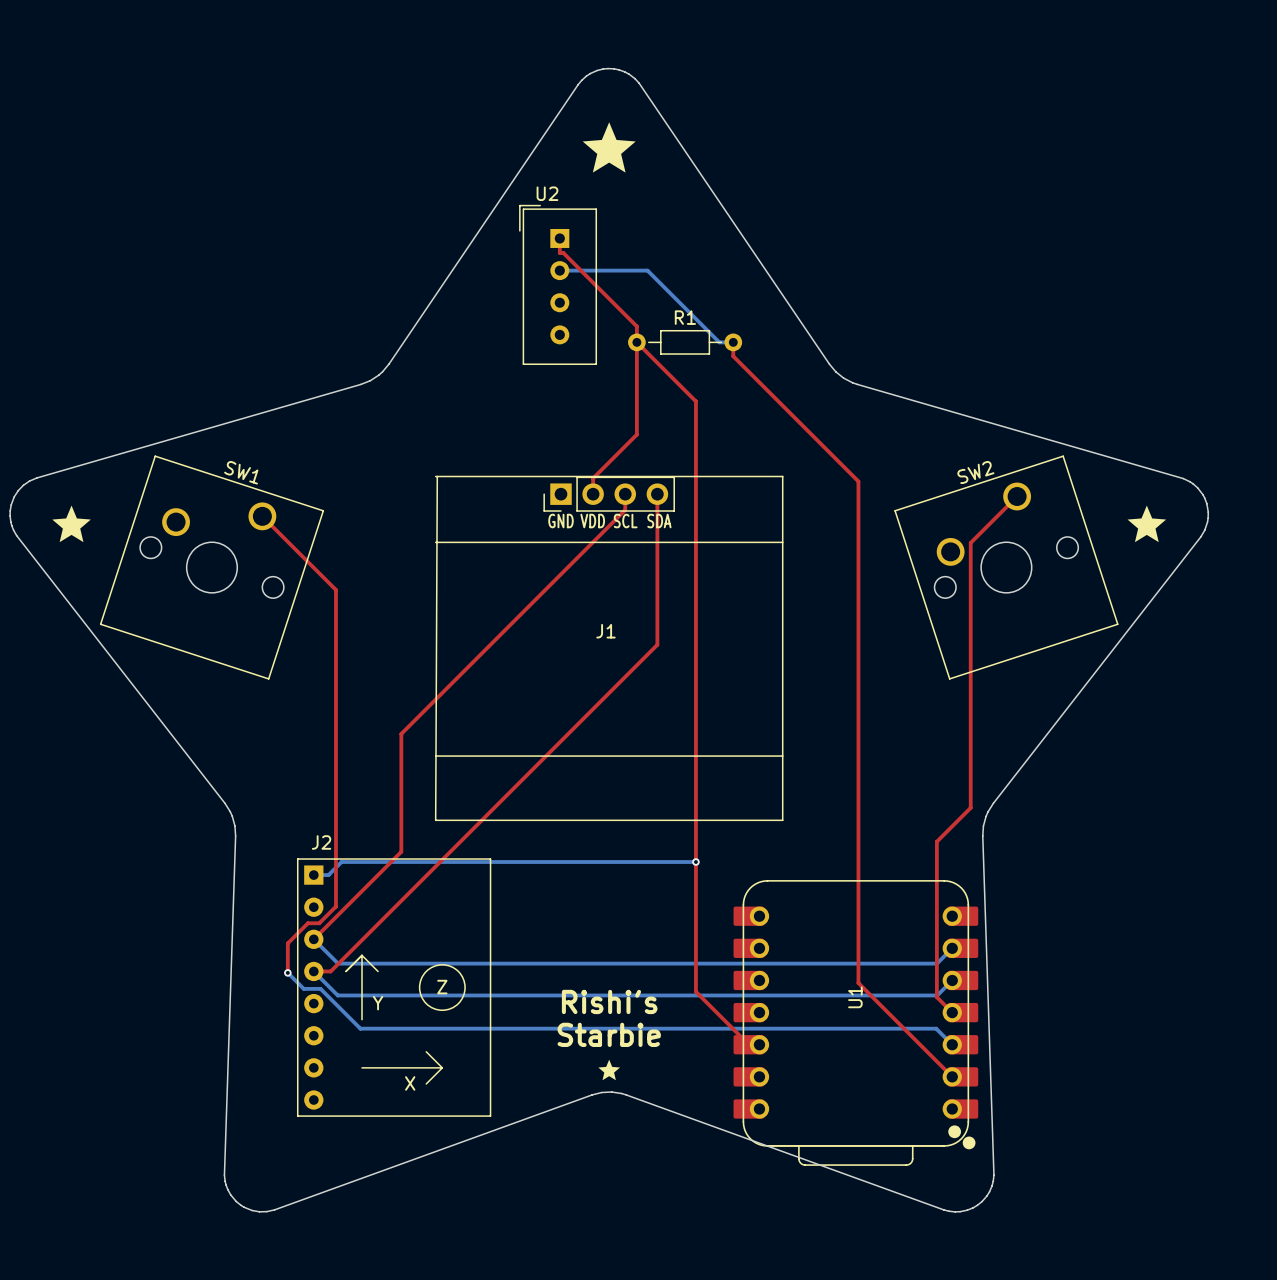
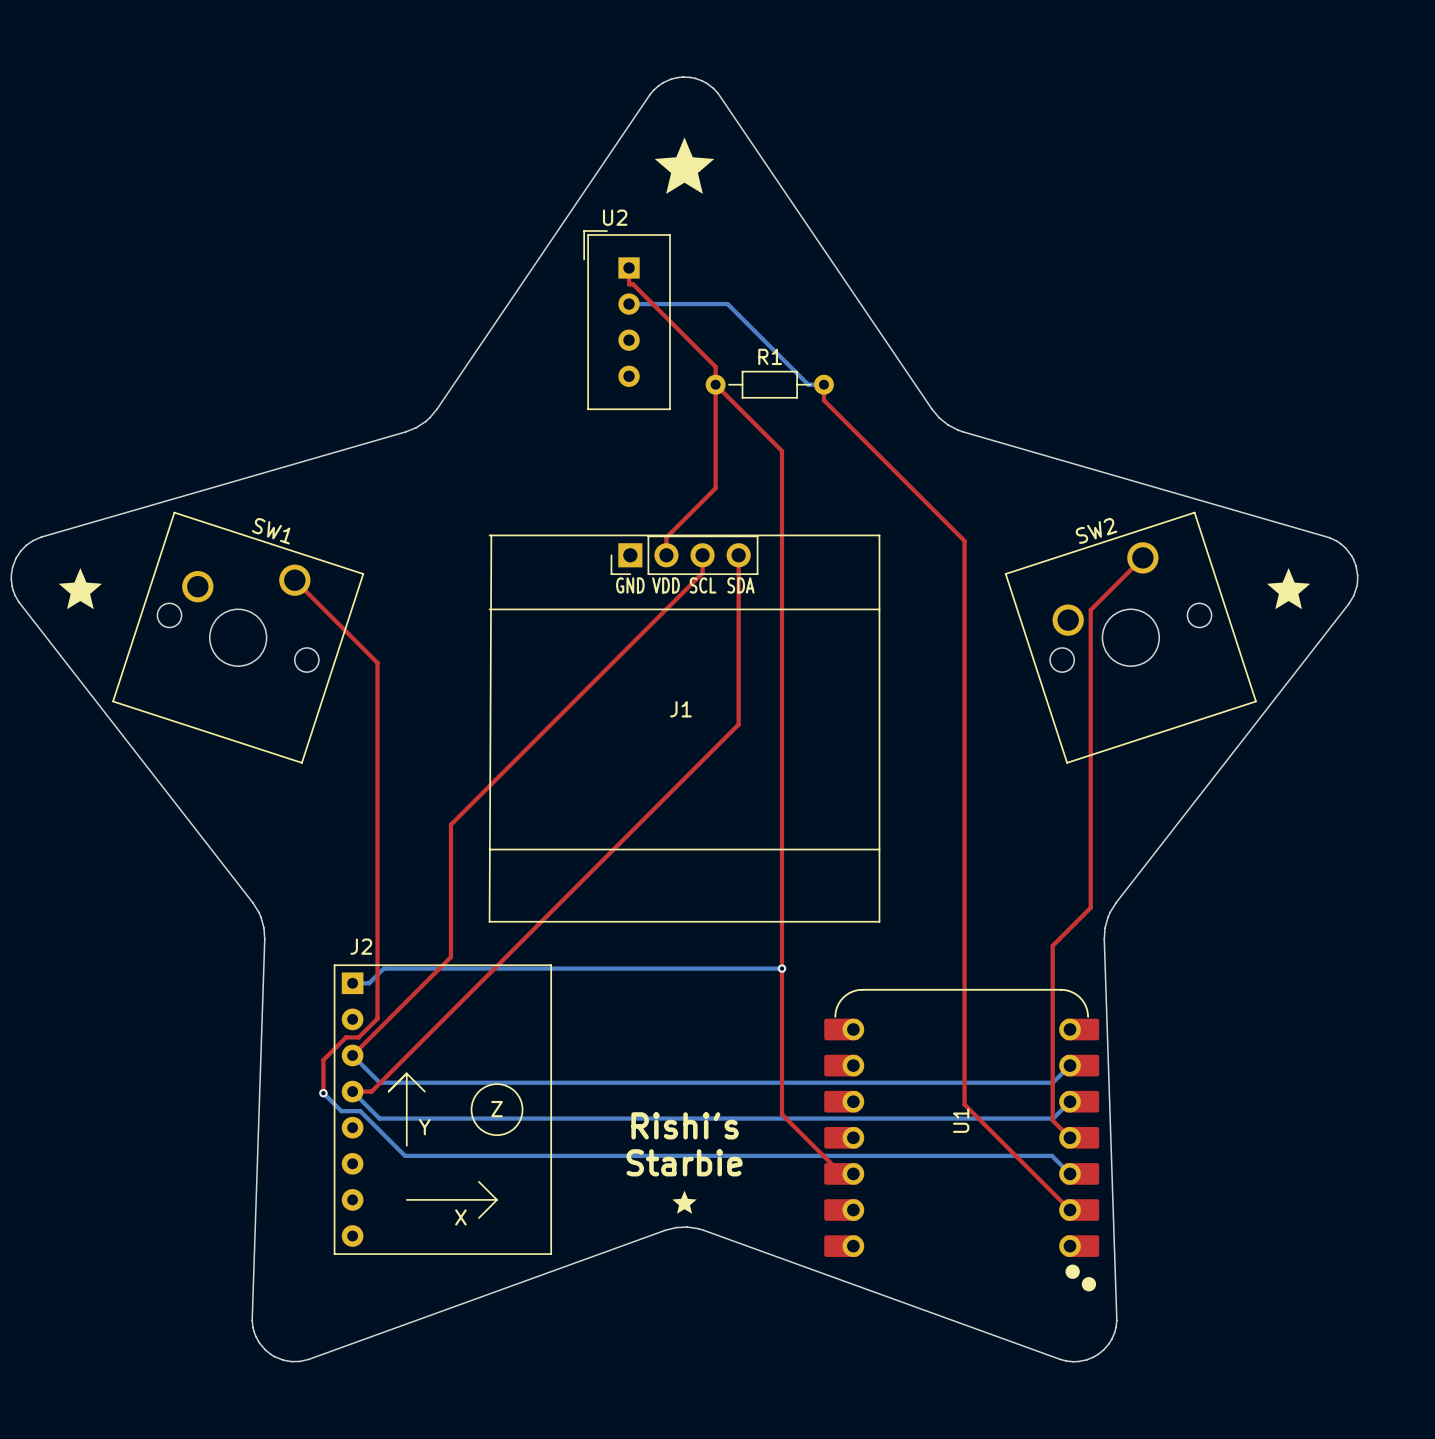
U1 footprint: [733, 880, 979, 1166] -> [824, 988, 1100, 1292]

